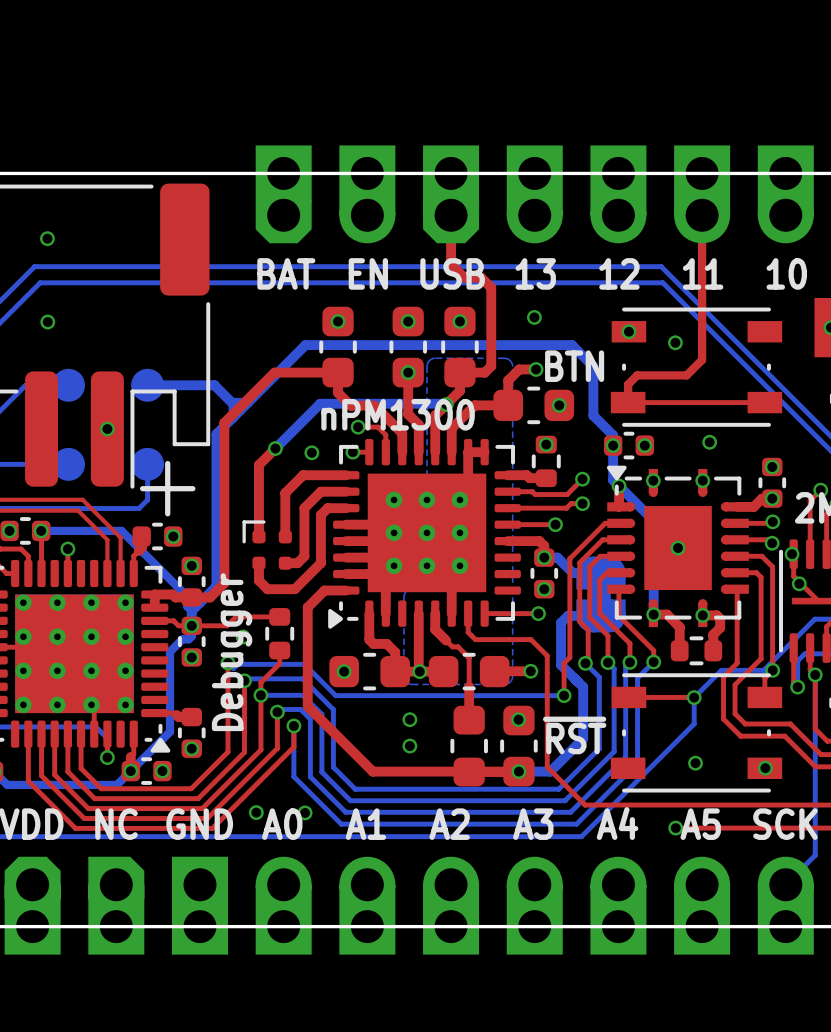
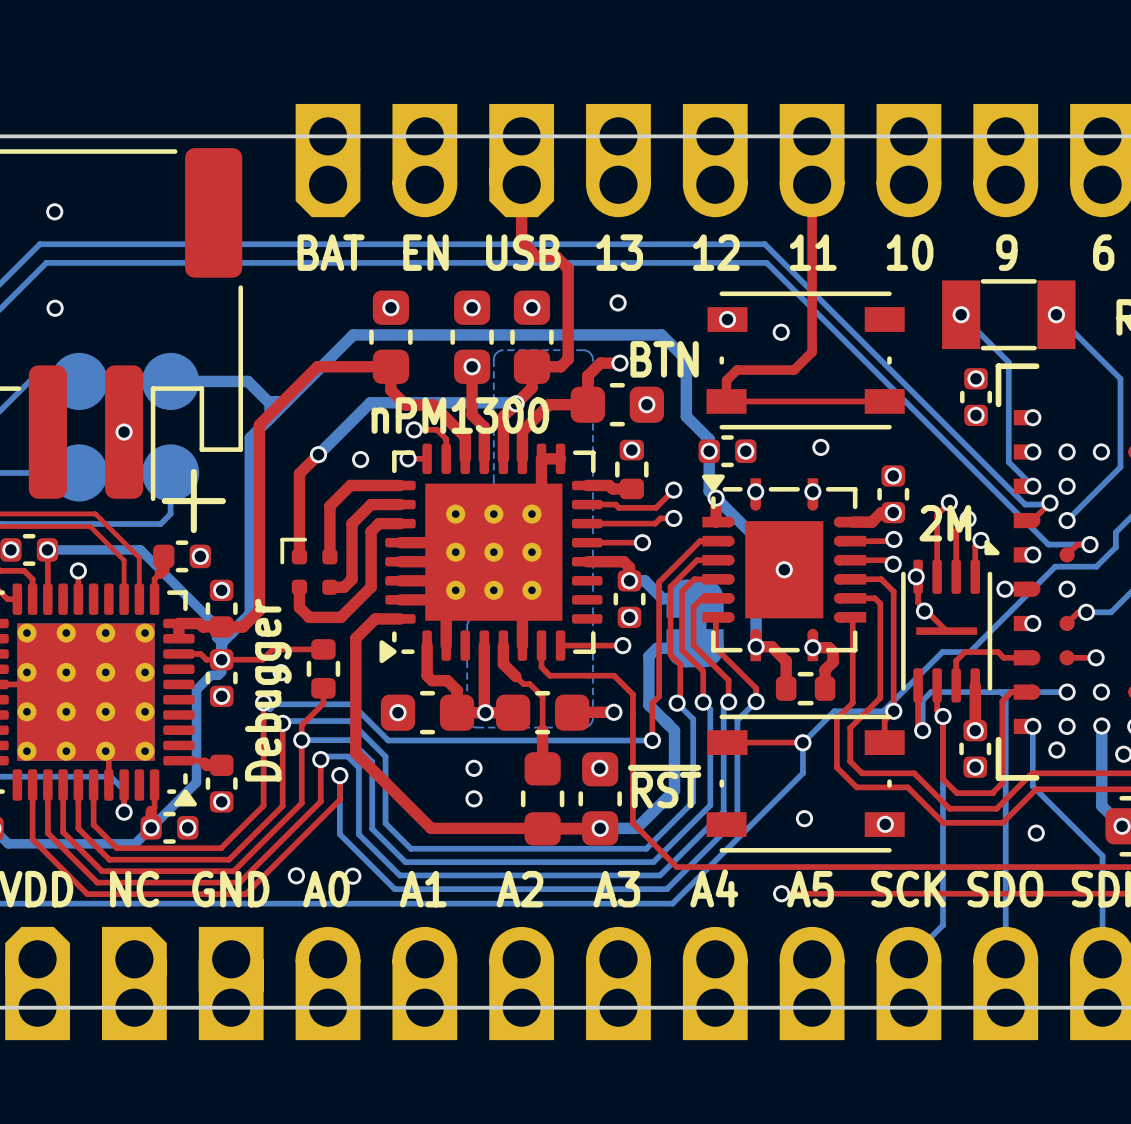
part footprint: [52, 368, 86, 402] -> [50, 352, 108, 411]
part footprint: [131, 368, 165, 402] -> [142, 352, 200, 411]
part footprint: [52, 447, 86, 481] -> [50, 444, 108, 502]
part footprint: [131, 447, 165, 481] -> [142, 444, 200, 502]

